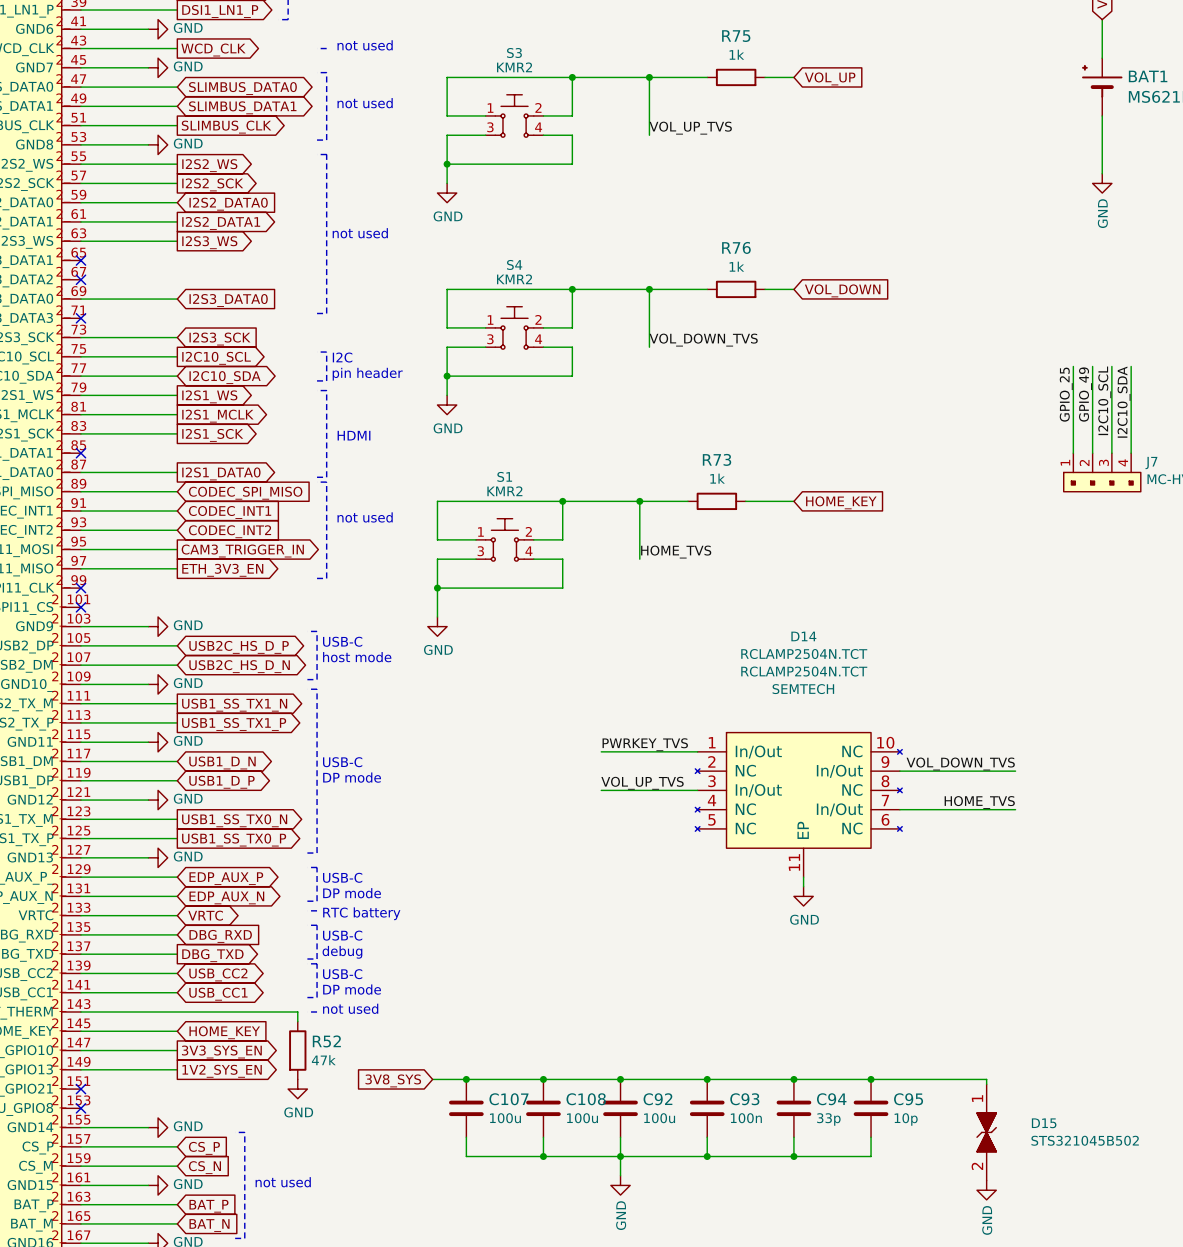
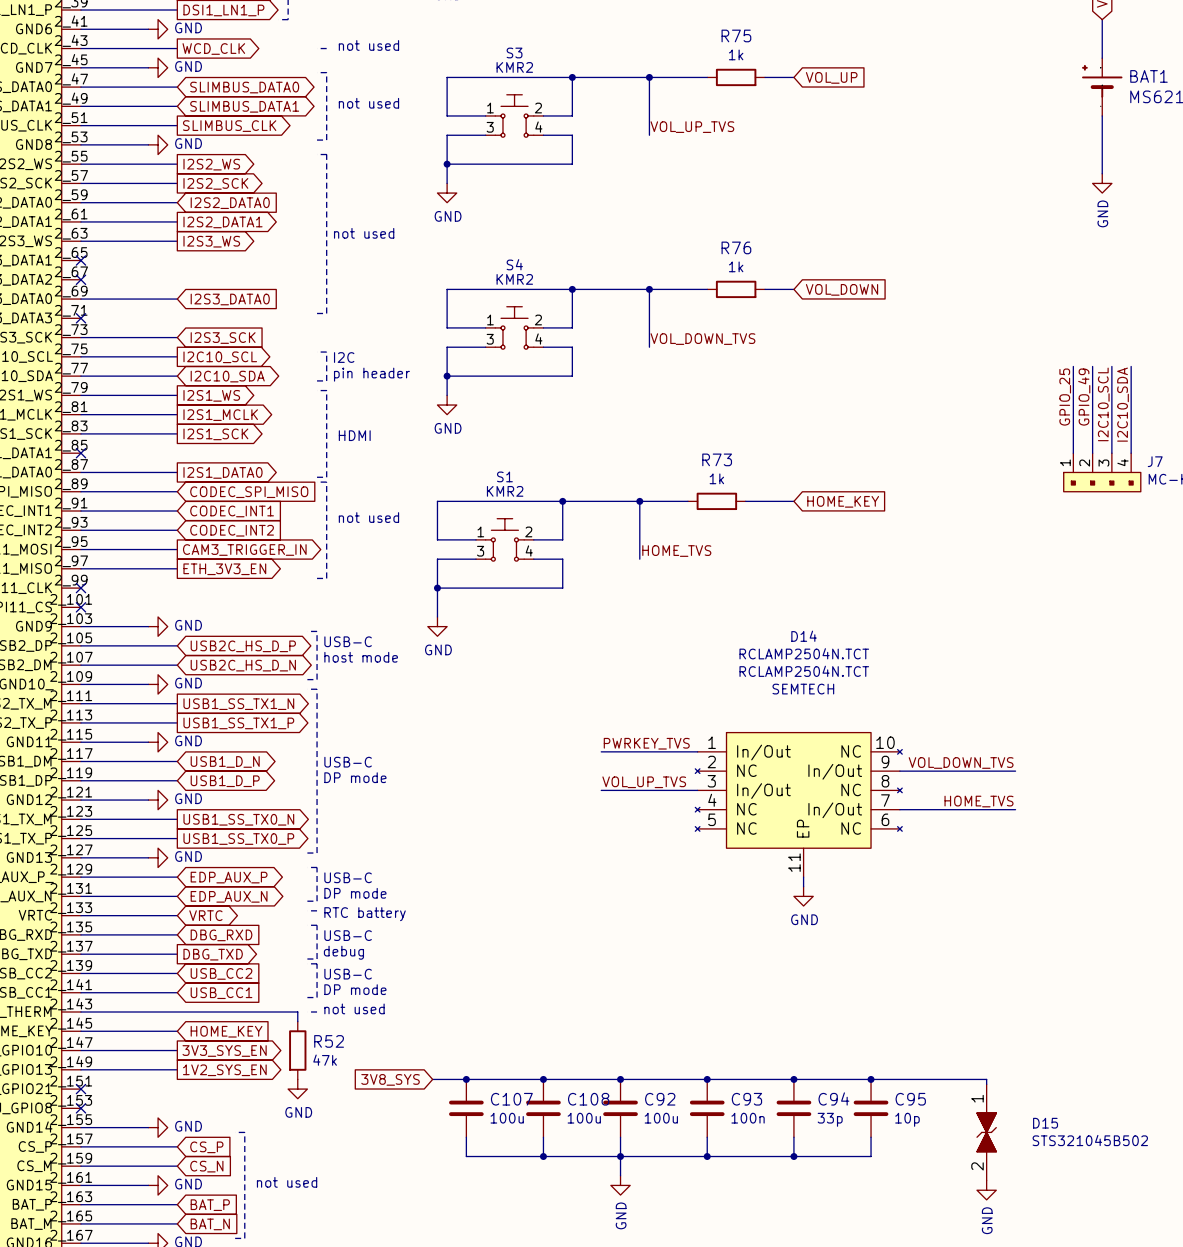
global label shape: bidirectional (218, 974) -> input (221, 973)
global label shape: bidirectional (218, 994) -> input (221, 993)

